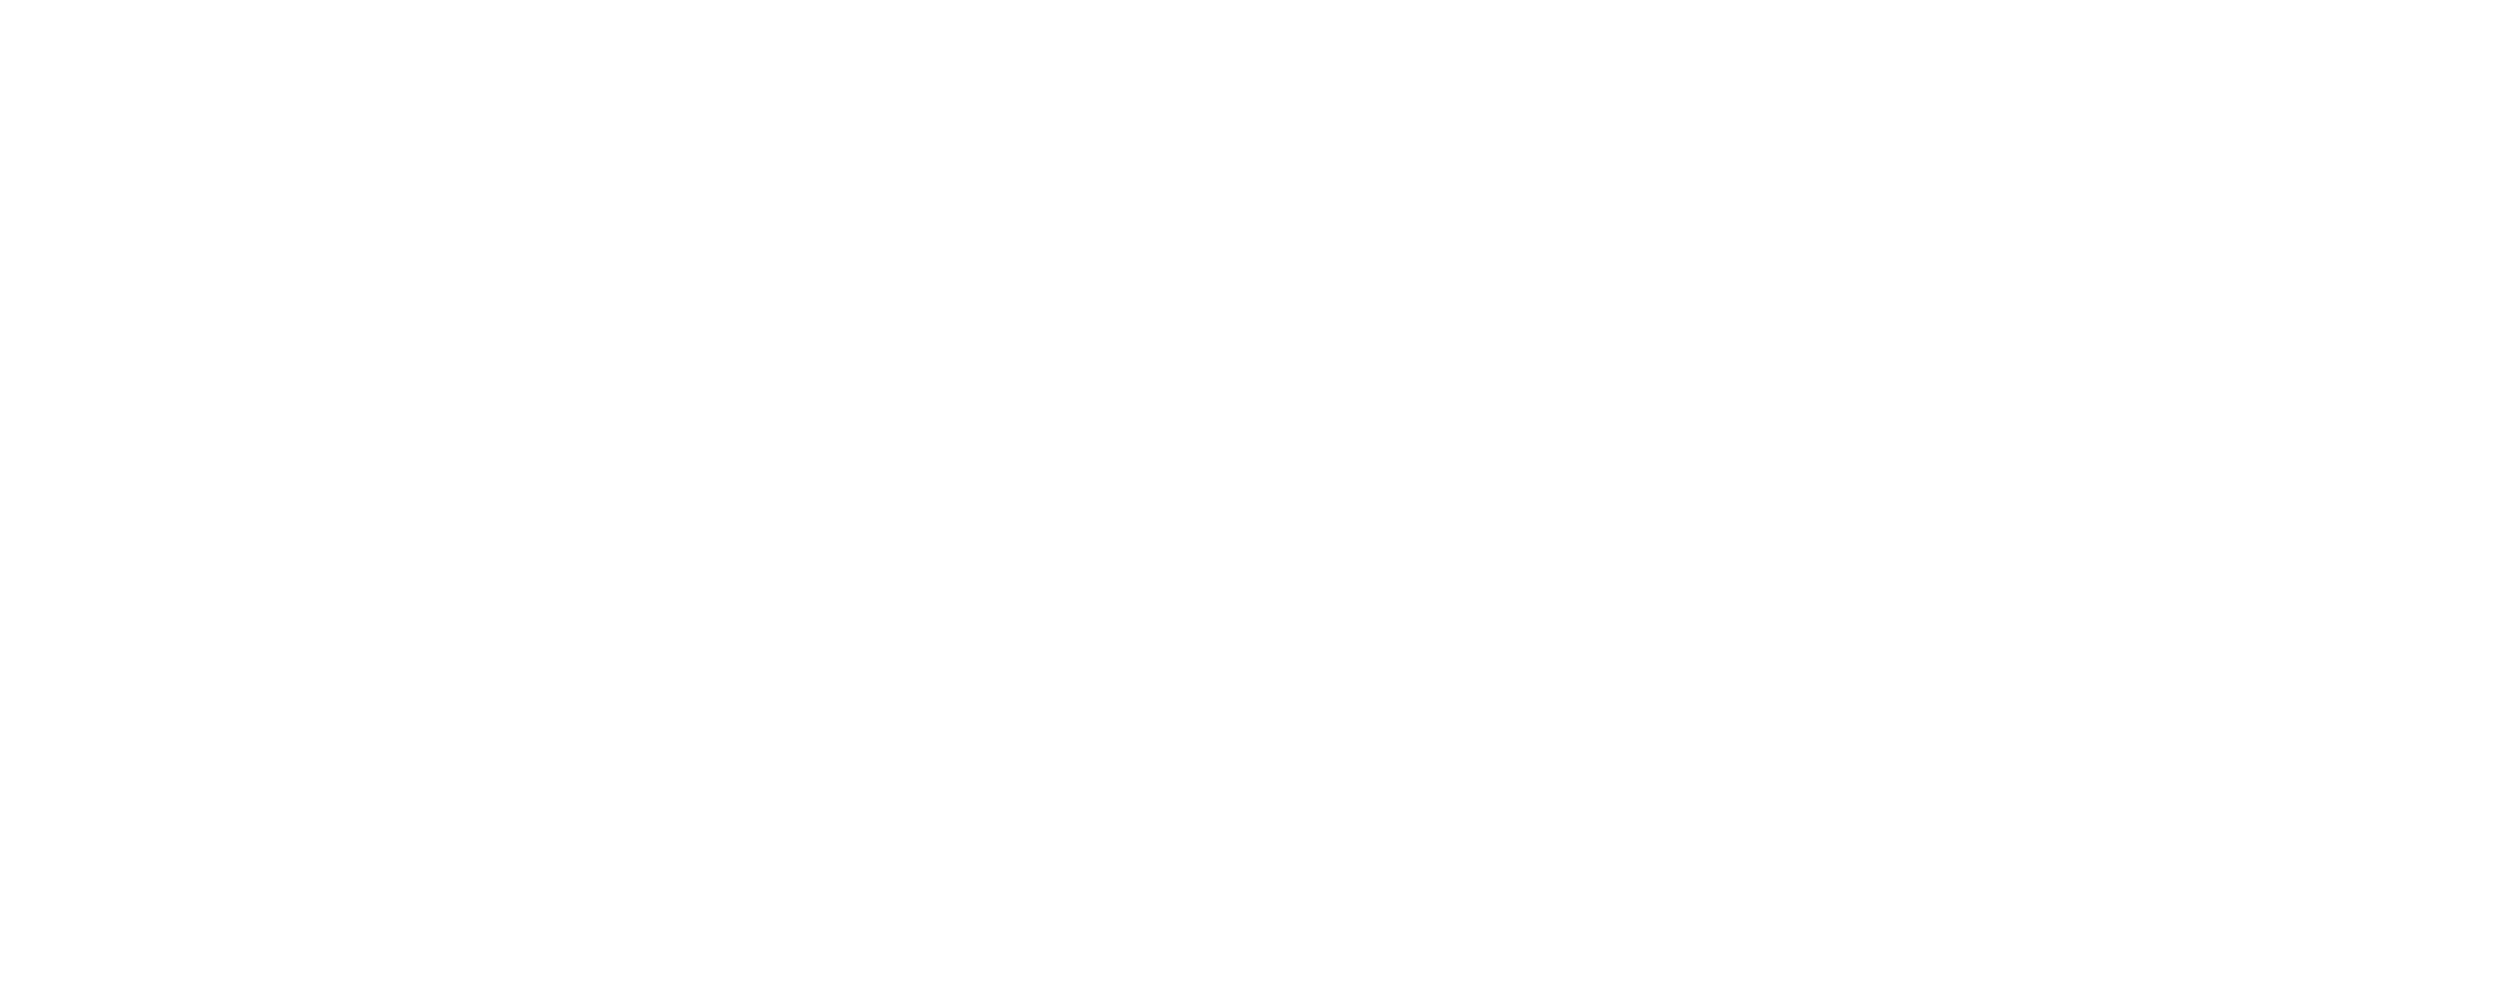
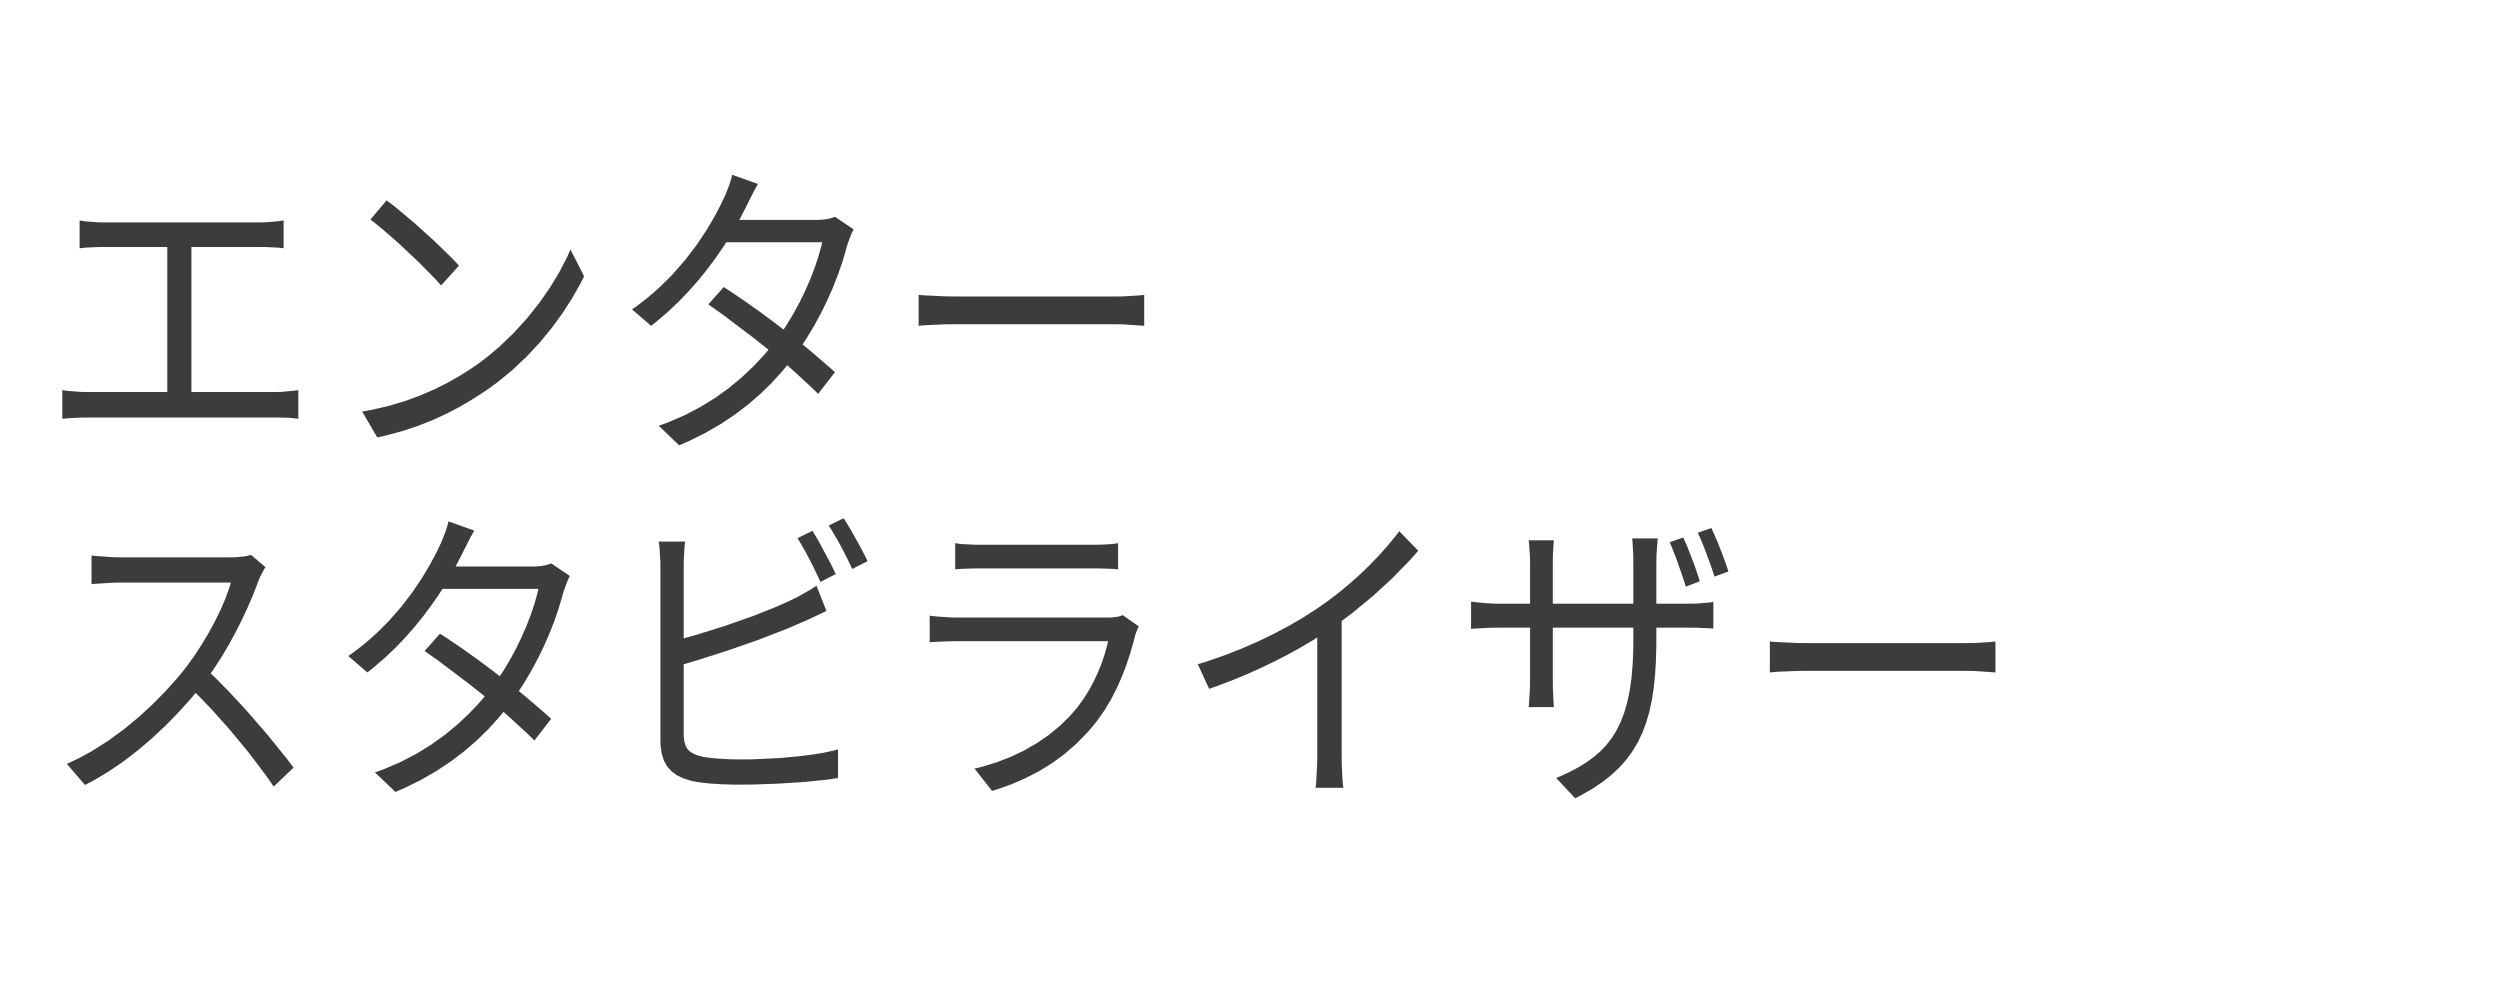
text: none -> エンター (603, 310)
text: none -> スタビライザー (1031, 658)

